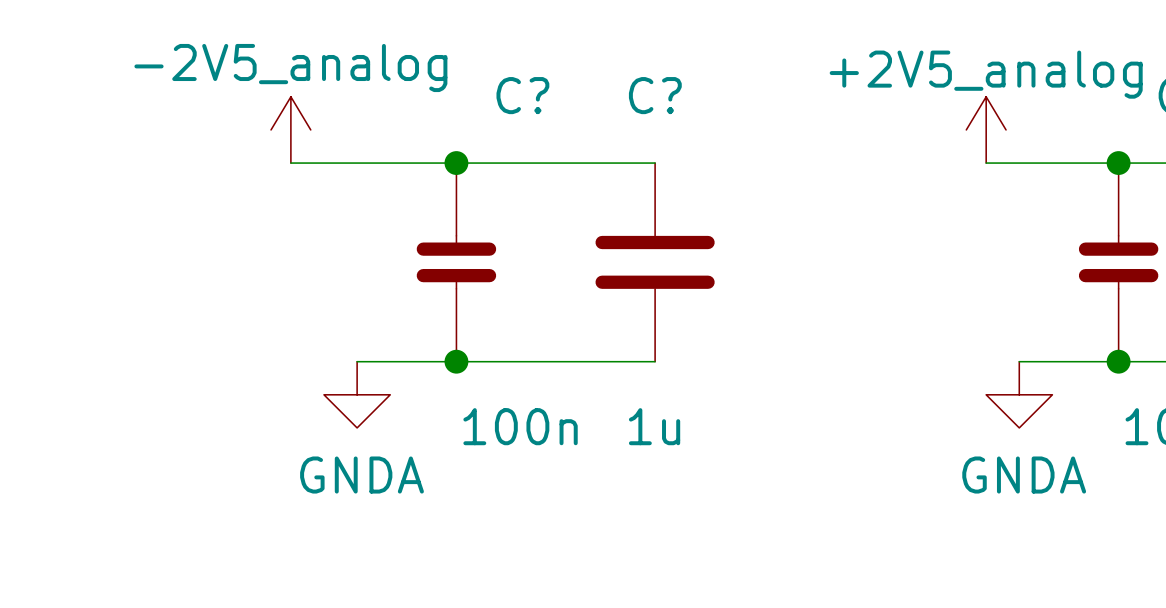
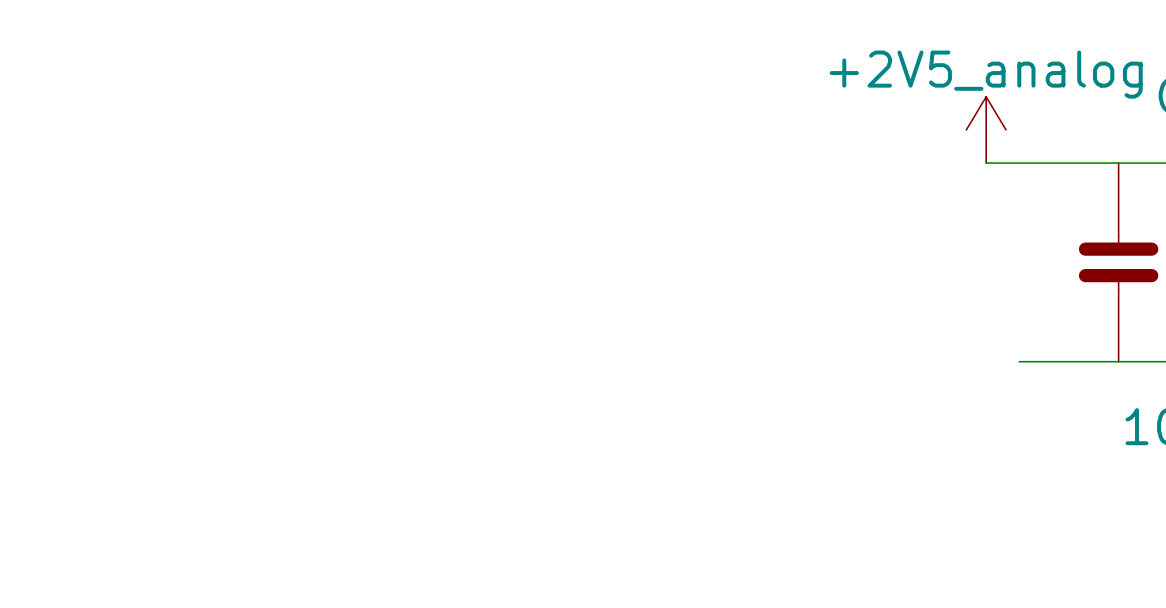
power symbol: -2V5_analog (290, 129) -> none
wire: (290, 163) (655, 163) -> none
junction: (456, 163) -> none
junction: (1118, 163) -> none
C?: 100n (456, 262) -> none
C?: 1u (655, 262) -> none
wire: (357, 361) (655, 361) -> none
junction: (456, 361) -> none
junction: (1118, 361) -> none
power symbol: GNDA (357, 394) -> none
power symbol: GNDA (1019, 394) -> none

